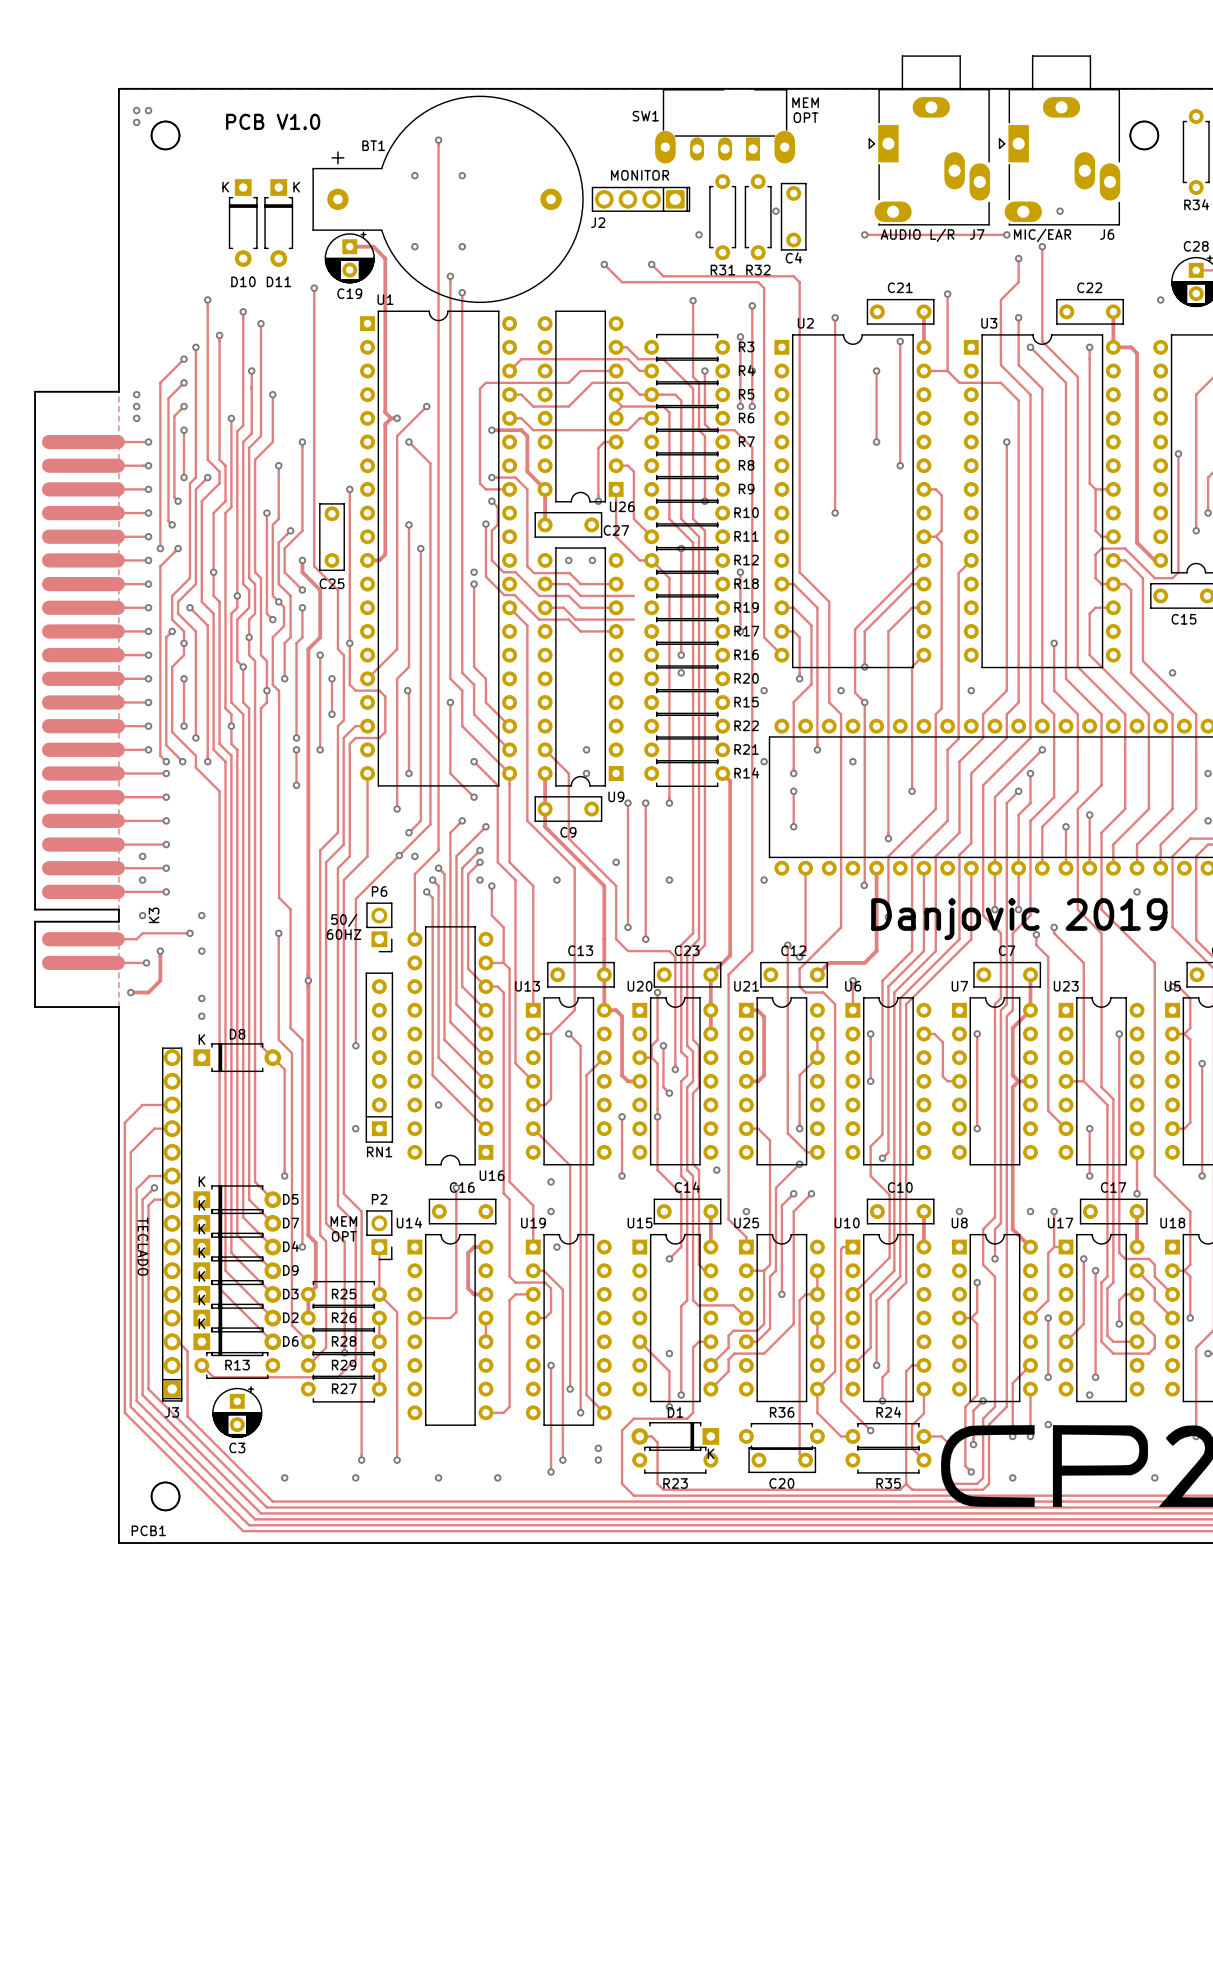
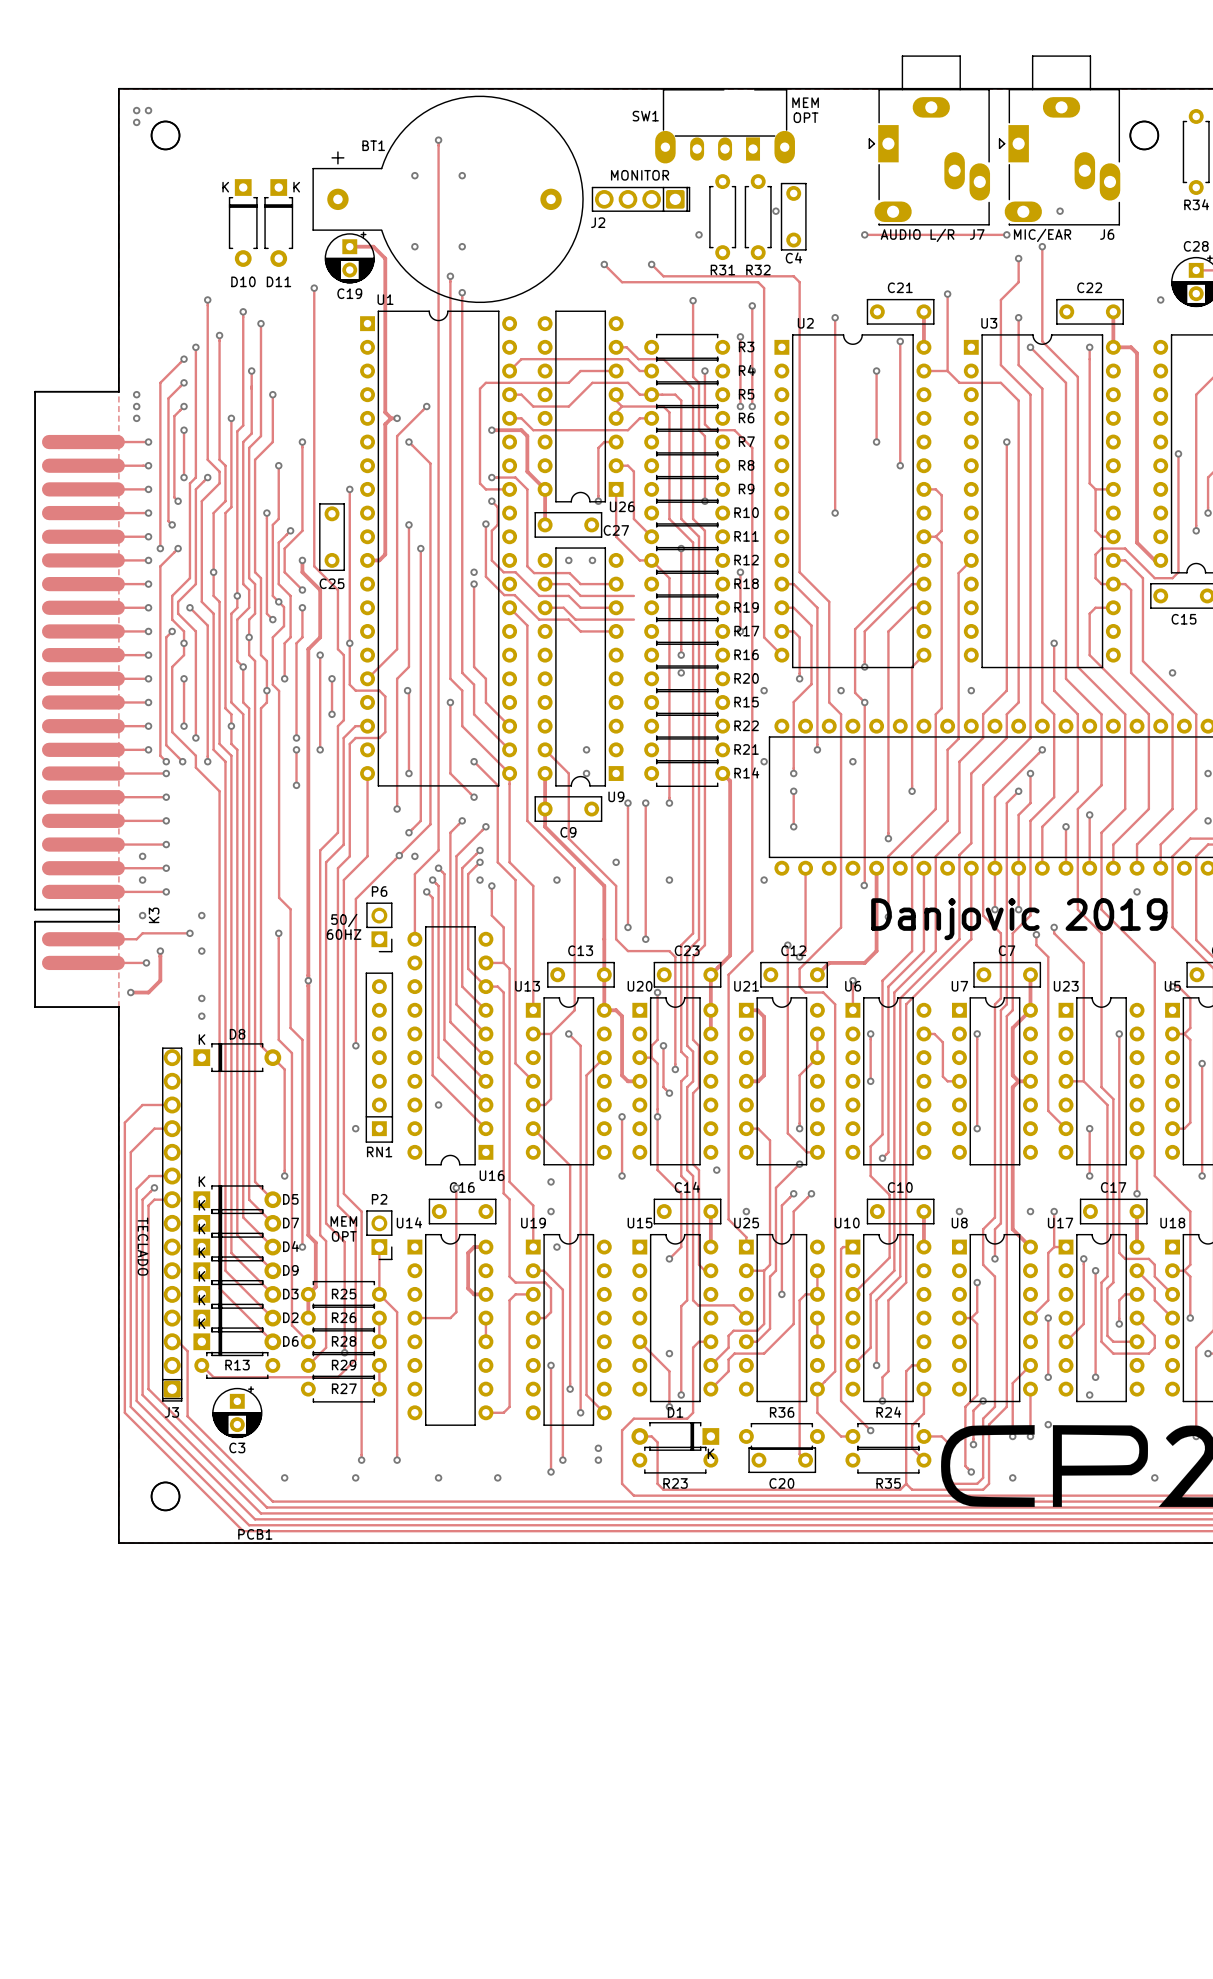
text: PCB V1.0 (273, 121) -> none
PCB1 name position: PCB1 (148, 1530) -> PCB1 (255, 1534)

